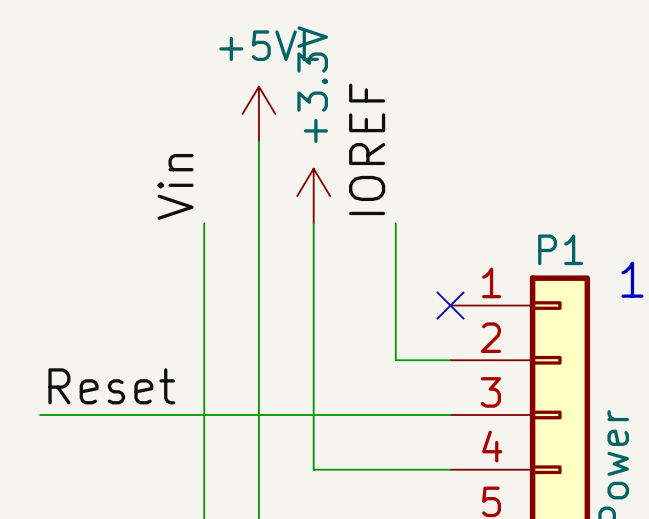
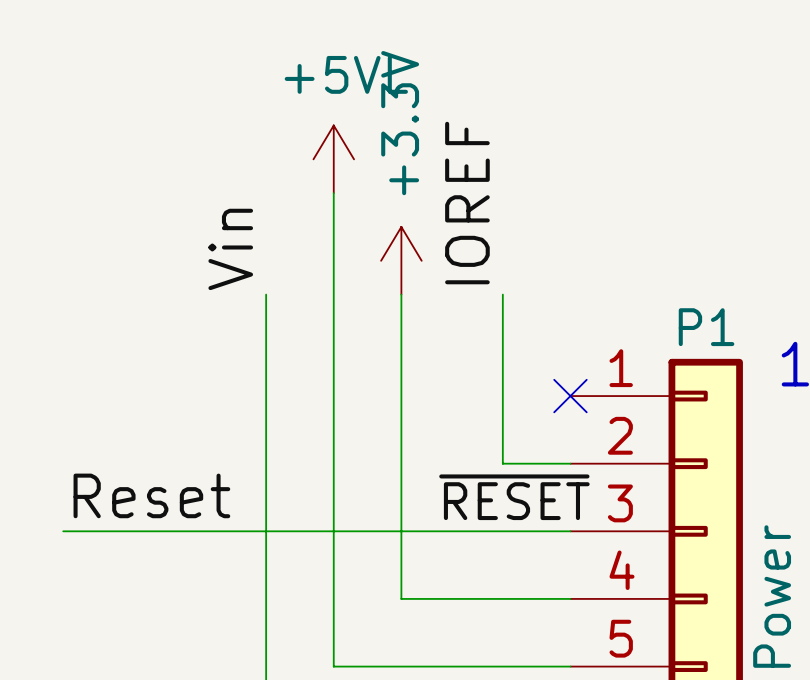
label: none -> ~{RESET} (514, 497)

